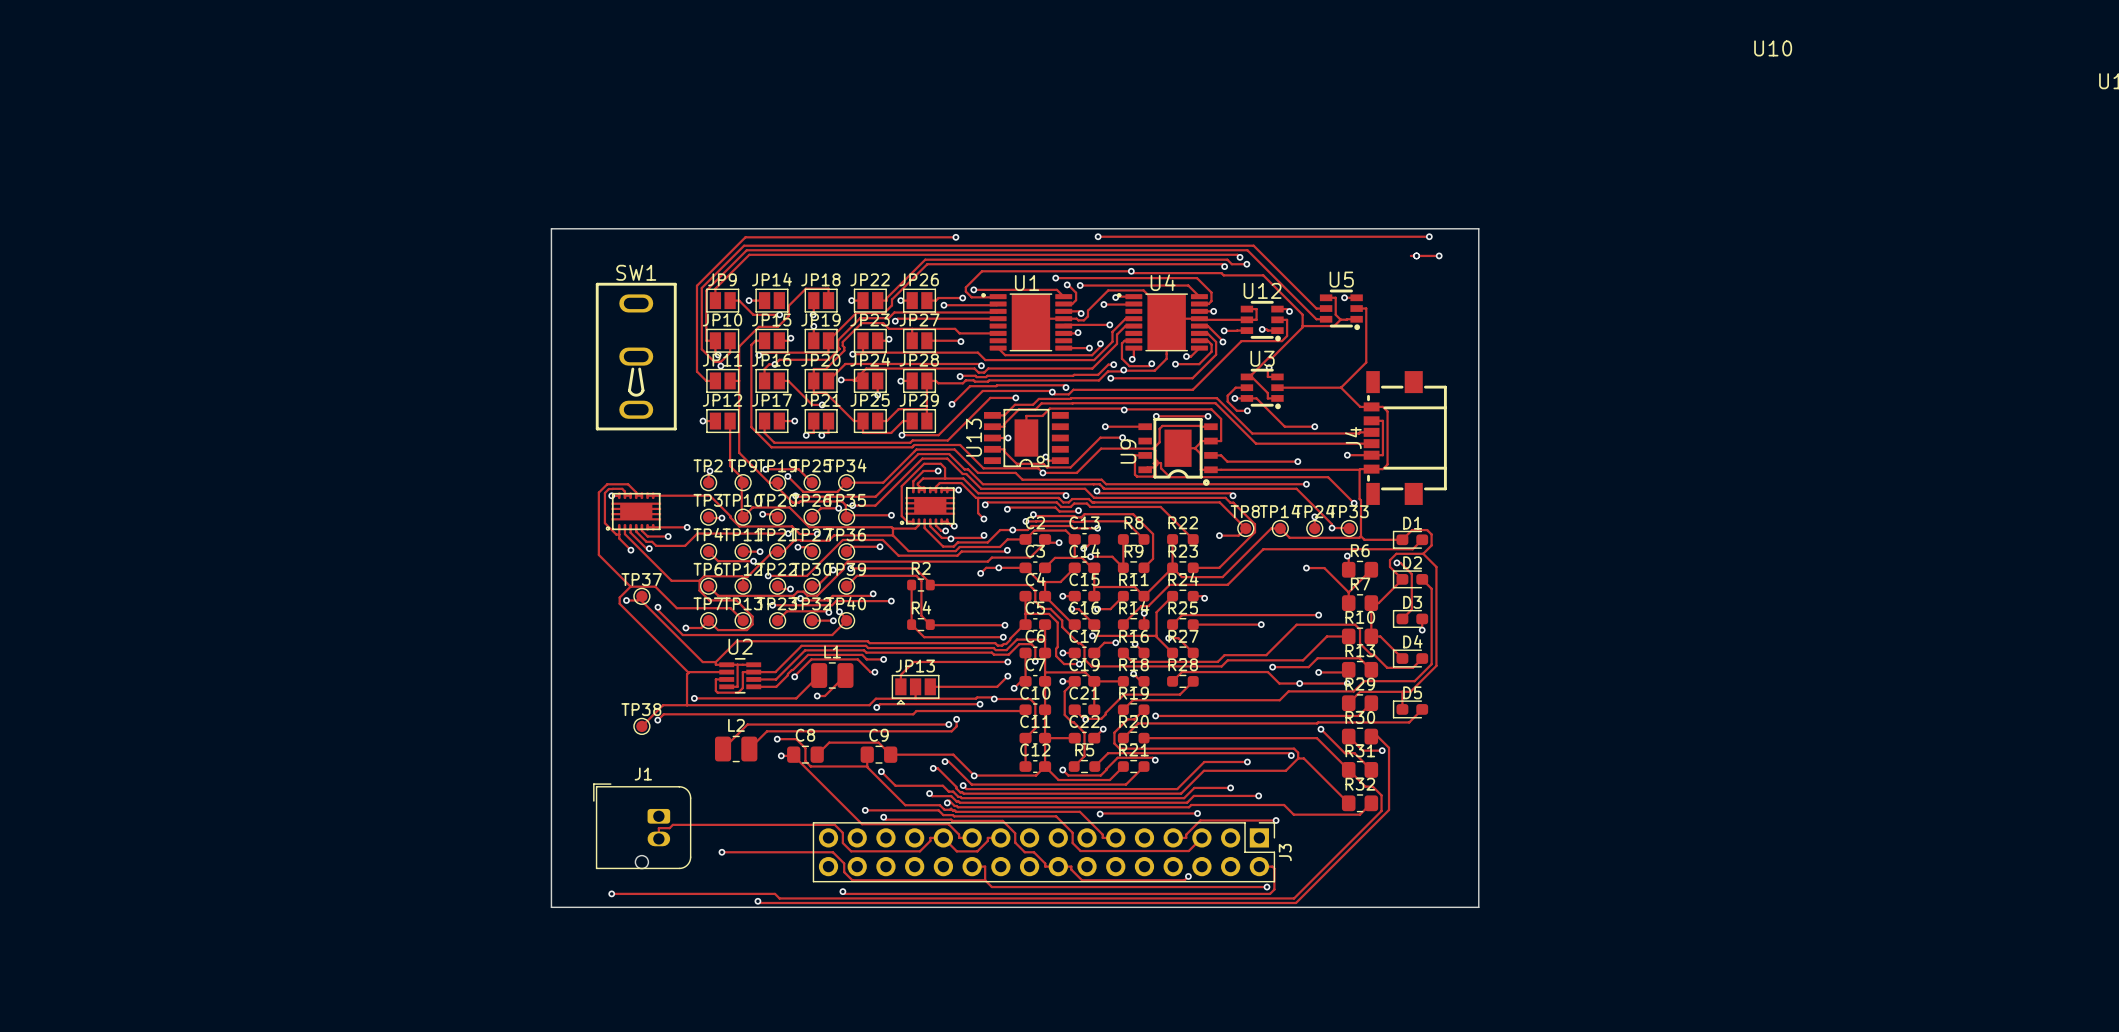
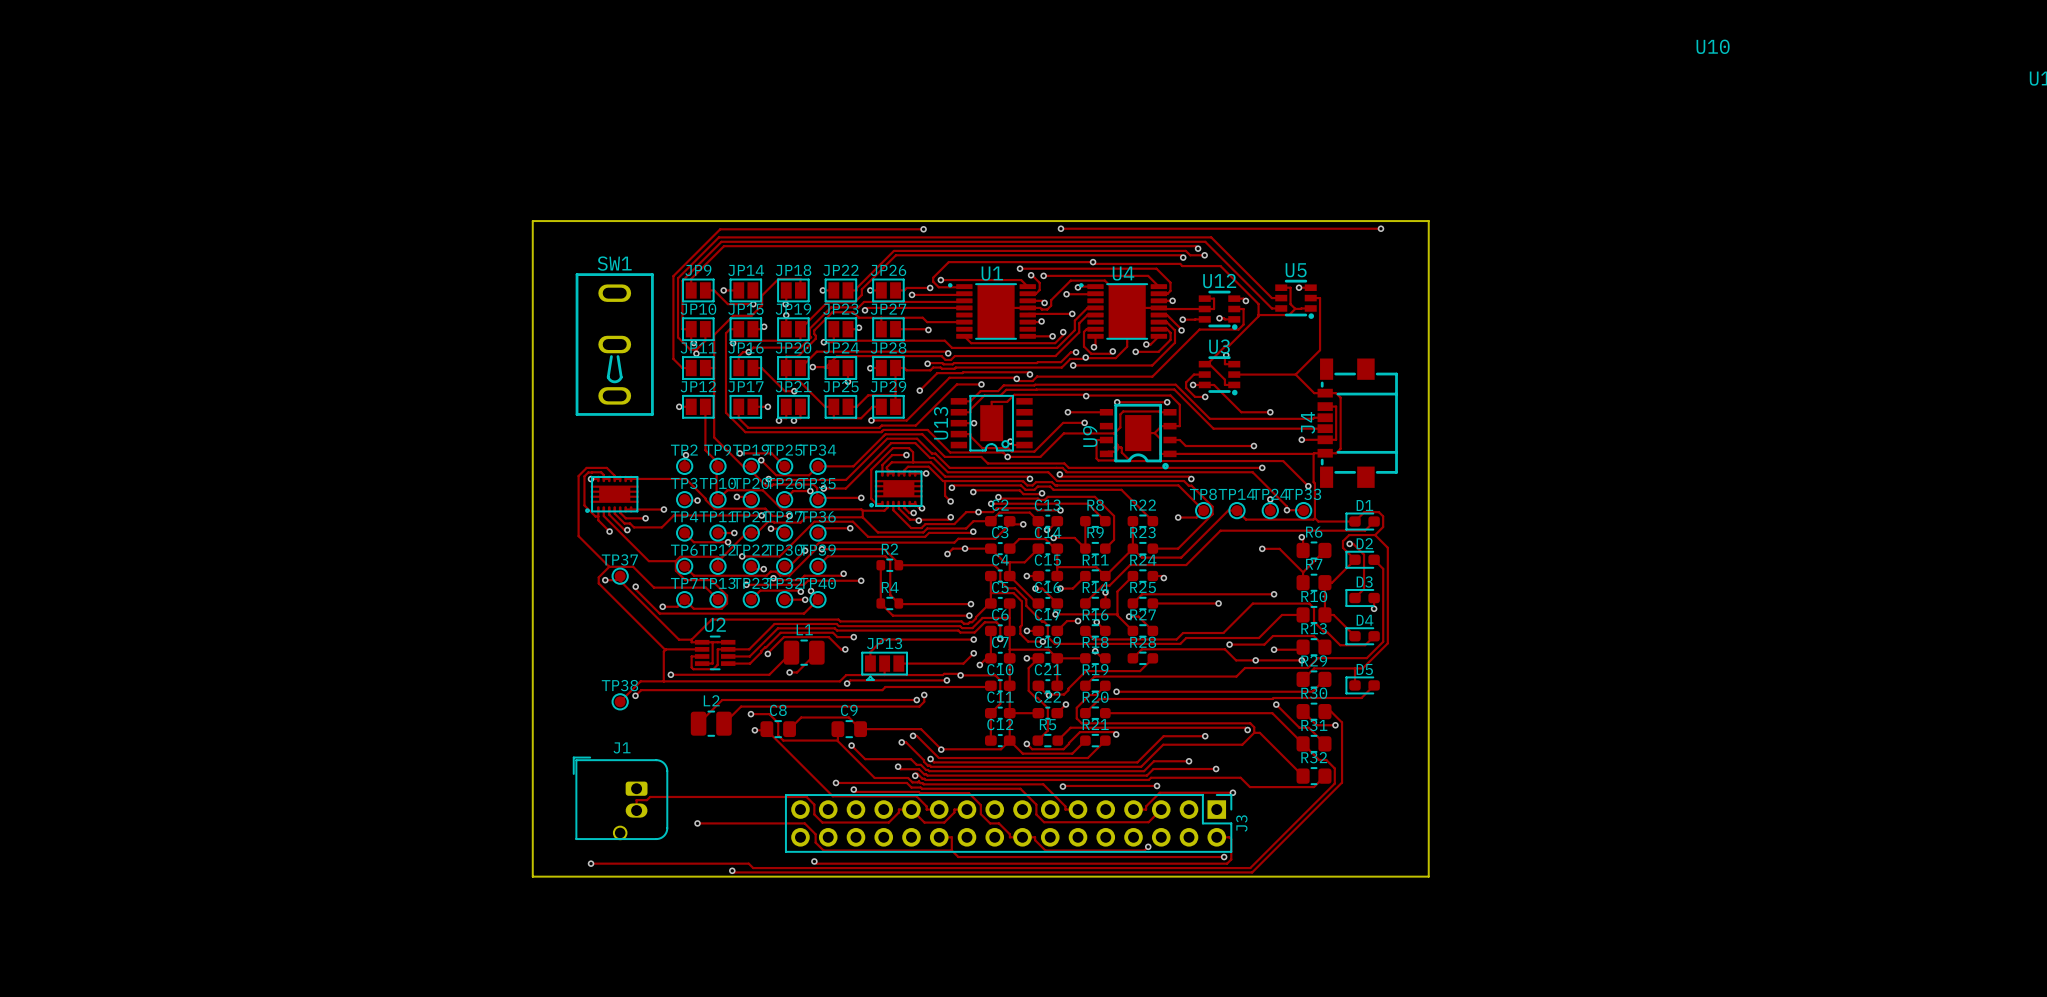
track: (1410, 255) (1439, 255) -> none
via: (1416, 255) -> none
via: (1439, 255) -> none

